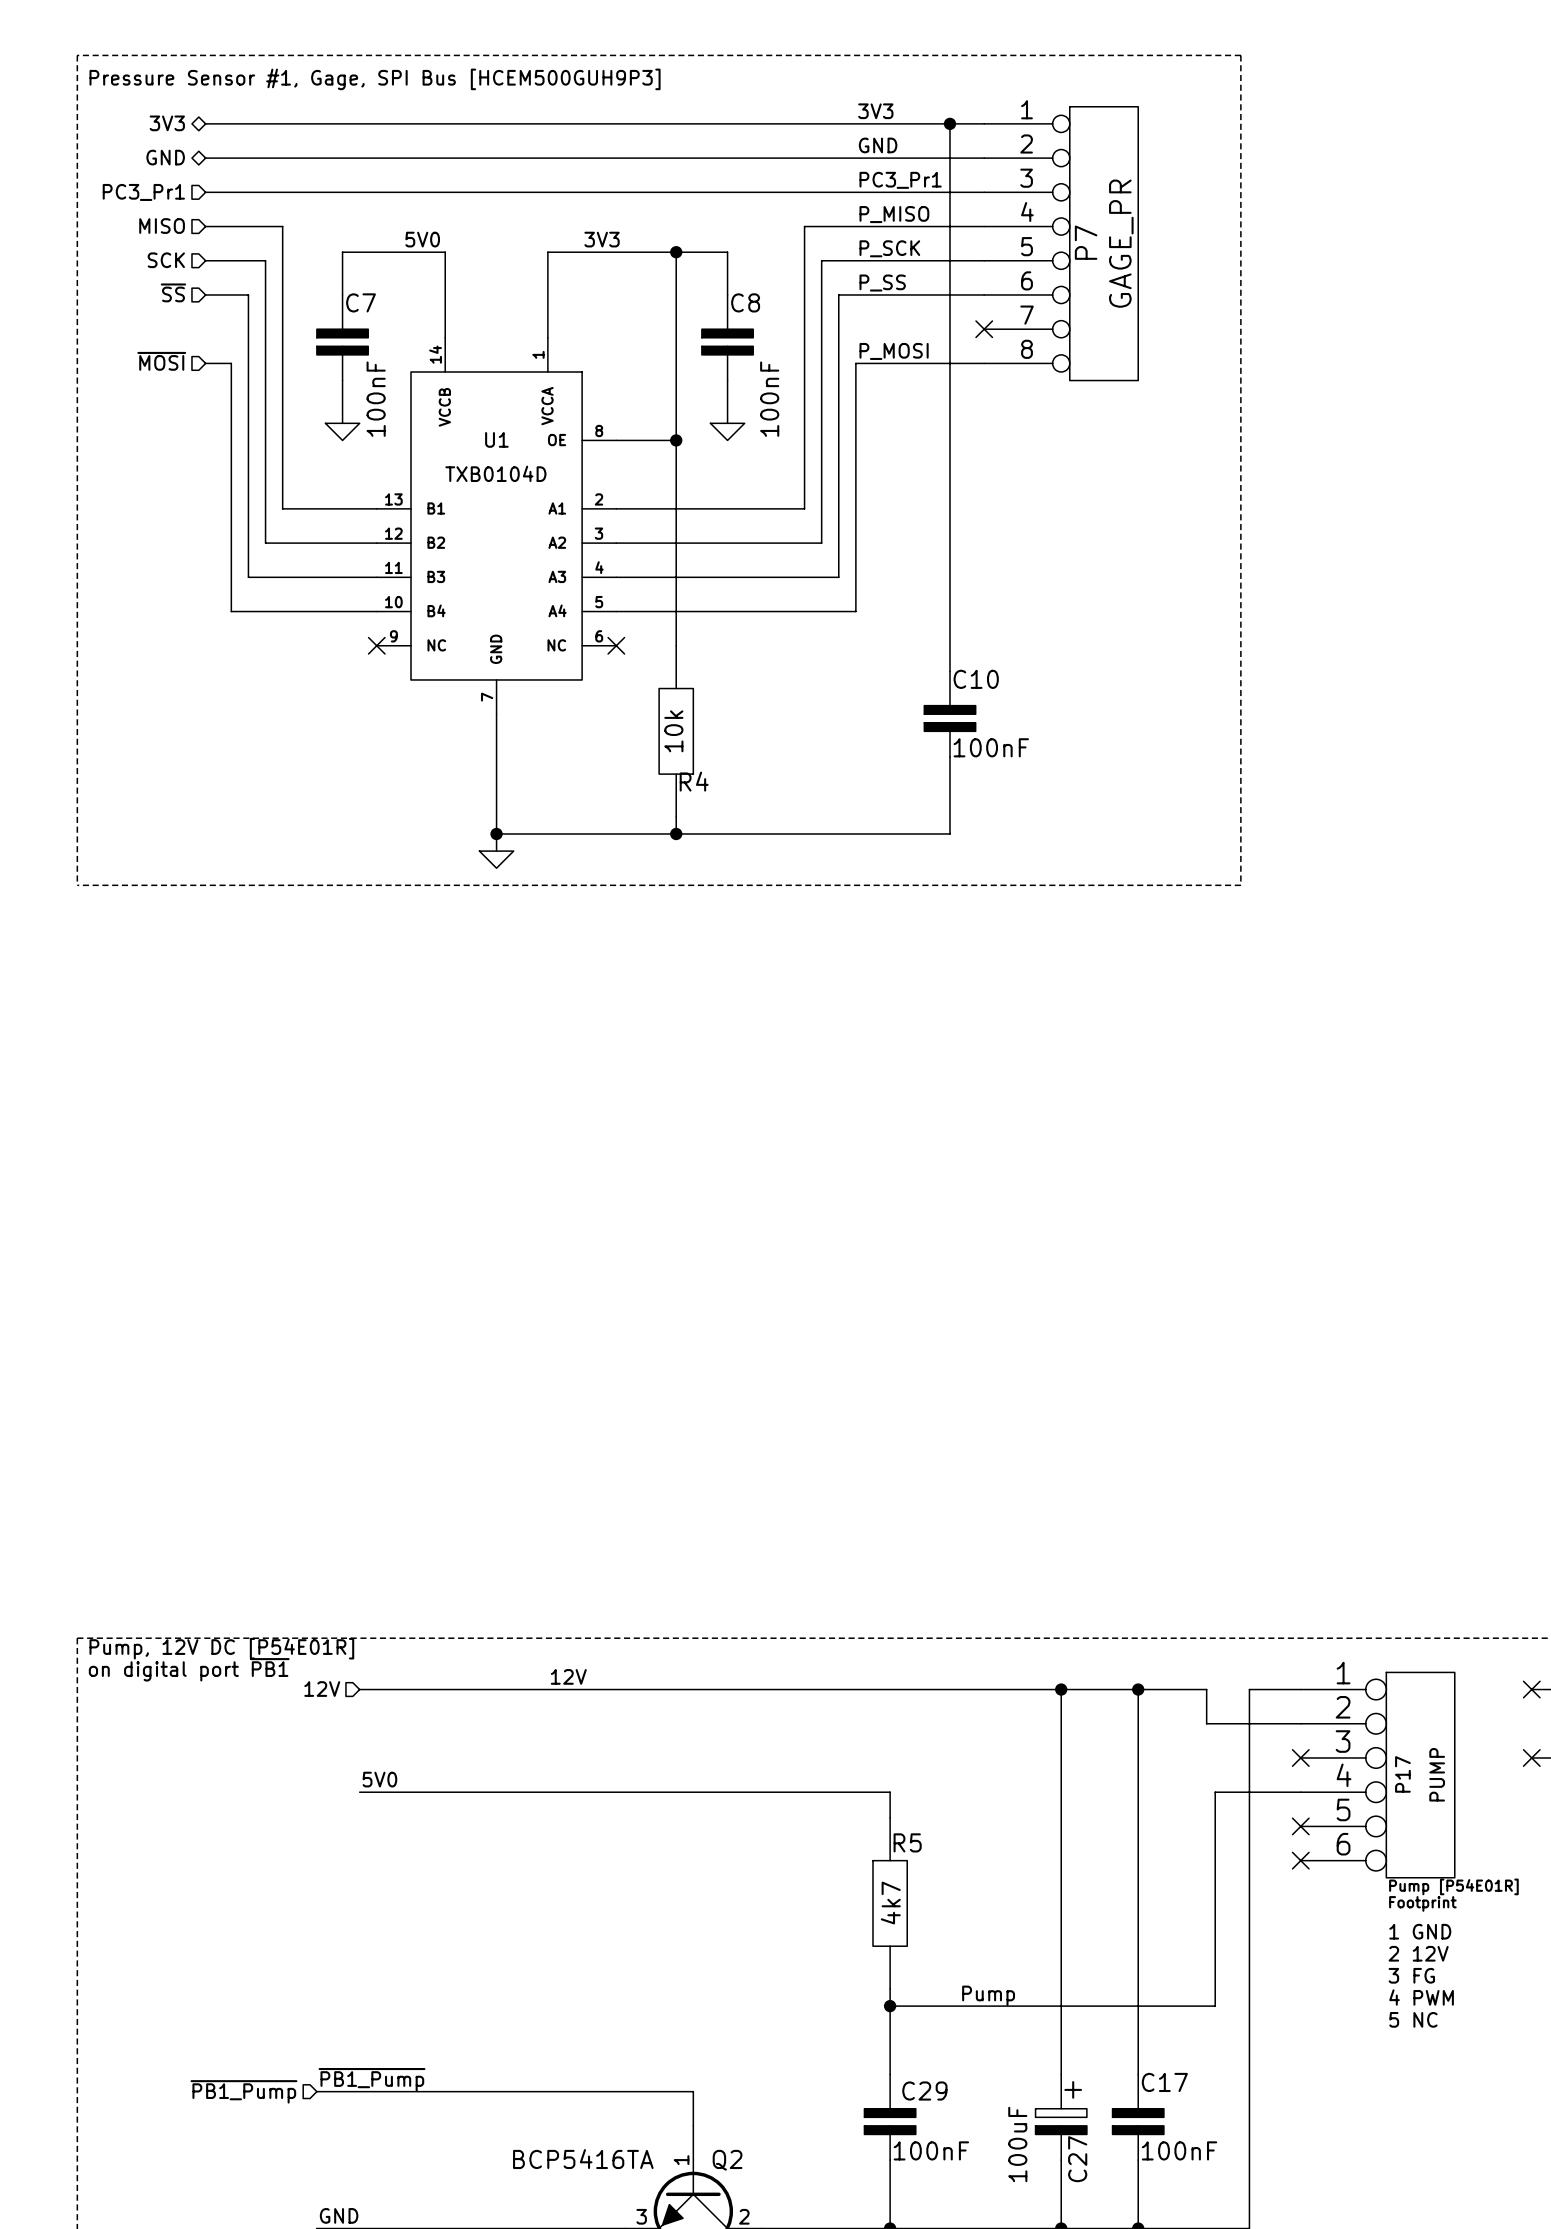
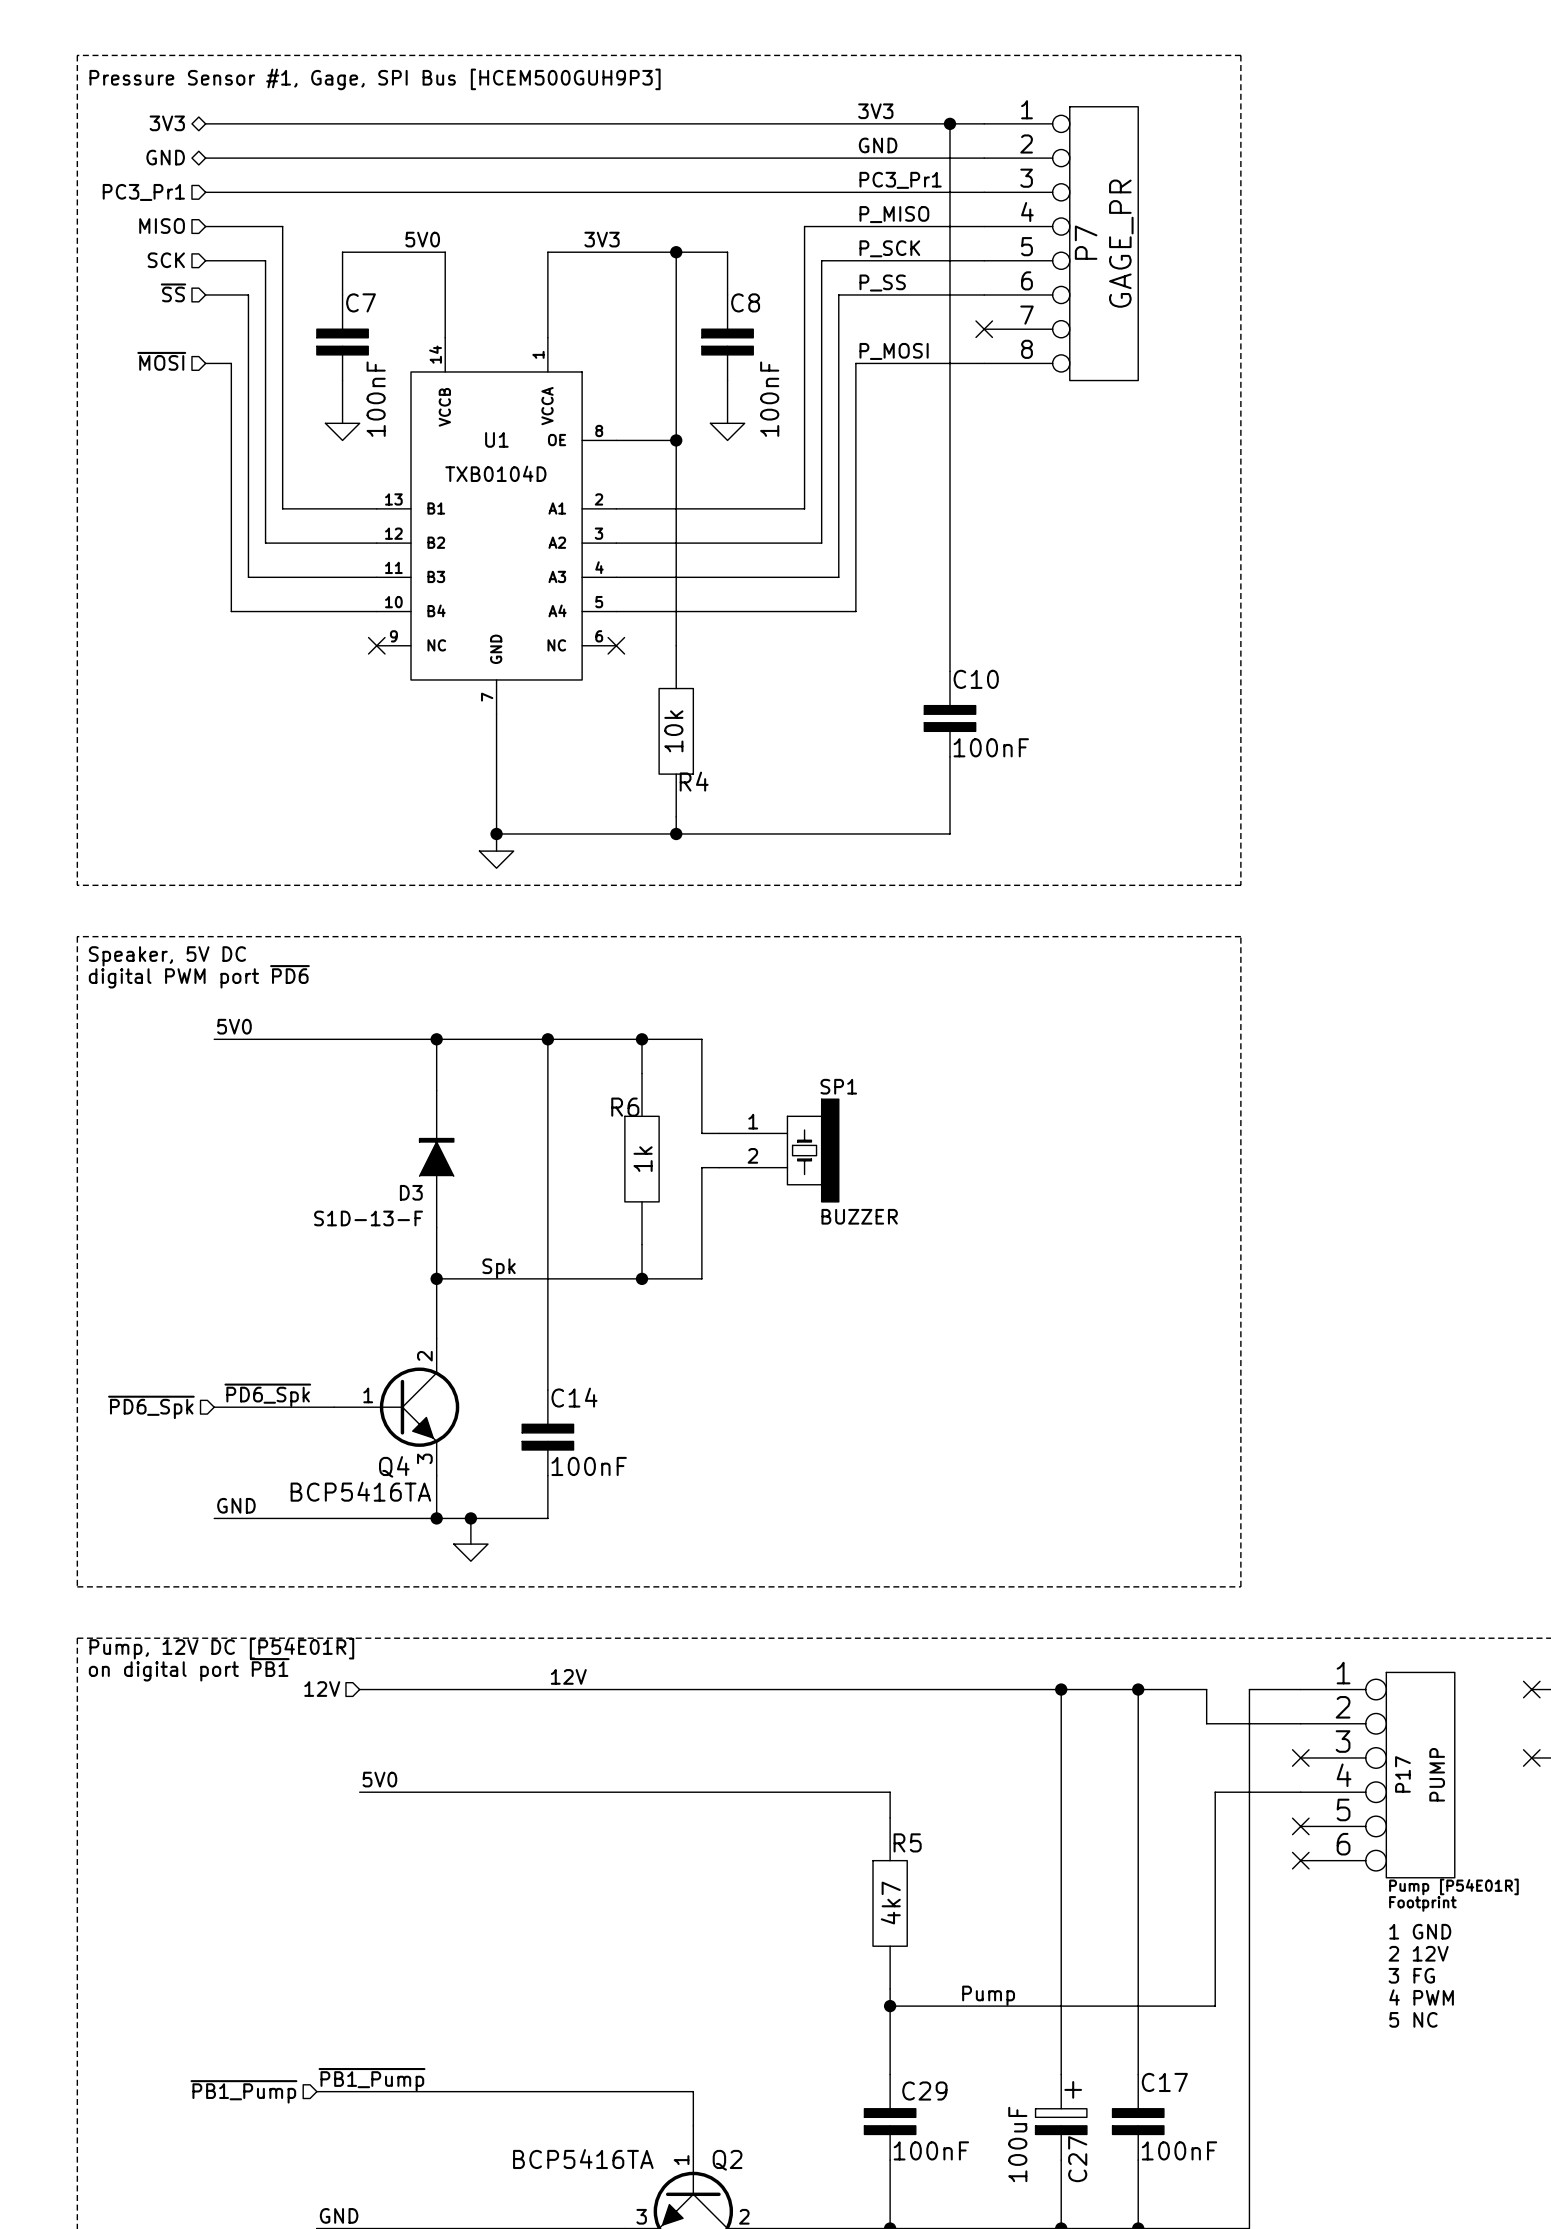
line: none -> (77, 936) (77, 1586) (1240, 1586) (1240, 936) (77, 936)
text: none -> Speaker, 5V DC (167, 956)
text: none -> digital PWM port ~{PD6} (199, 976)
label: none -> 5V0 (234, 1026)
wire: none -> (214, 1039) (701, 1039) (701, 1133) (719, 1133)
wire: none -> (436, 1039) (436, 1090)
junction: none -> (436, 1039)
wire: none -> (547, 1039) (547, 1390)
junction: none -> (547, 1039)
wire: none -> (642, 1039) (642, 1073)
junction: none -> (642, 1039)
SP1: none -> BUZZER (778, 1150)
D3: none -> S1D-13-F (436, 1159)
R6: none -> 1k (642, 1159)
wire: none -> (719, 1167) (701, 1167) (701, 1278) (436, 1278)
wire: none -> (436, 1227) (436, 1338)
wire: none -> (642, 1244) (642, 1278)
label: none -> Spk (499, 1268)
junction: none -> (436, 1278)
junction: none -> (642, 1278)
label: none -> ~{PD6_Spk} (267, 1395)
hierarchical label: none -> ~{PD6_Spk} (151, 1407)
wire: none -> (214, 1407) (334, 1407)
Q4: none -> BCP5416TA (396, 1407)
C14: none -> 100nF (547, 1432)
wire: none -> (436, 1475) (436, 1518)
wire: none -> (547, 1475) (547, 1518) (214, 1518)
label: none -> GND (236, 1505)
junction: none -> (436, 1518)
wire: none -> (470, 1518) (470, 1544)
junction: none -> (470, 1518)
power symbol: none -> (470, 1552)

